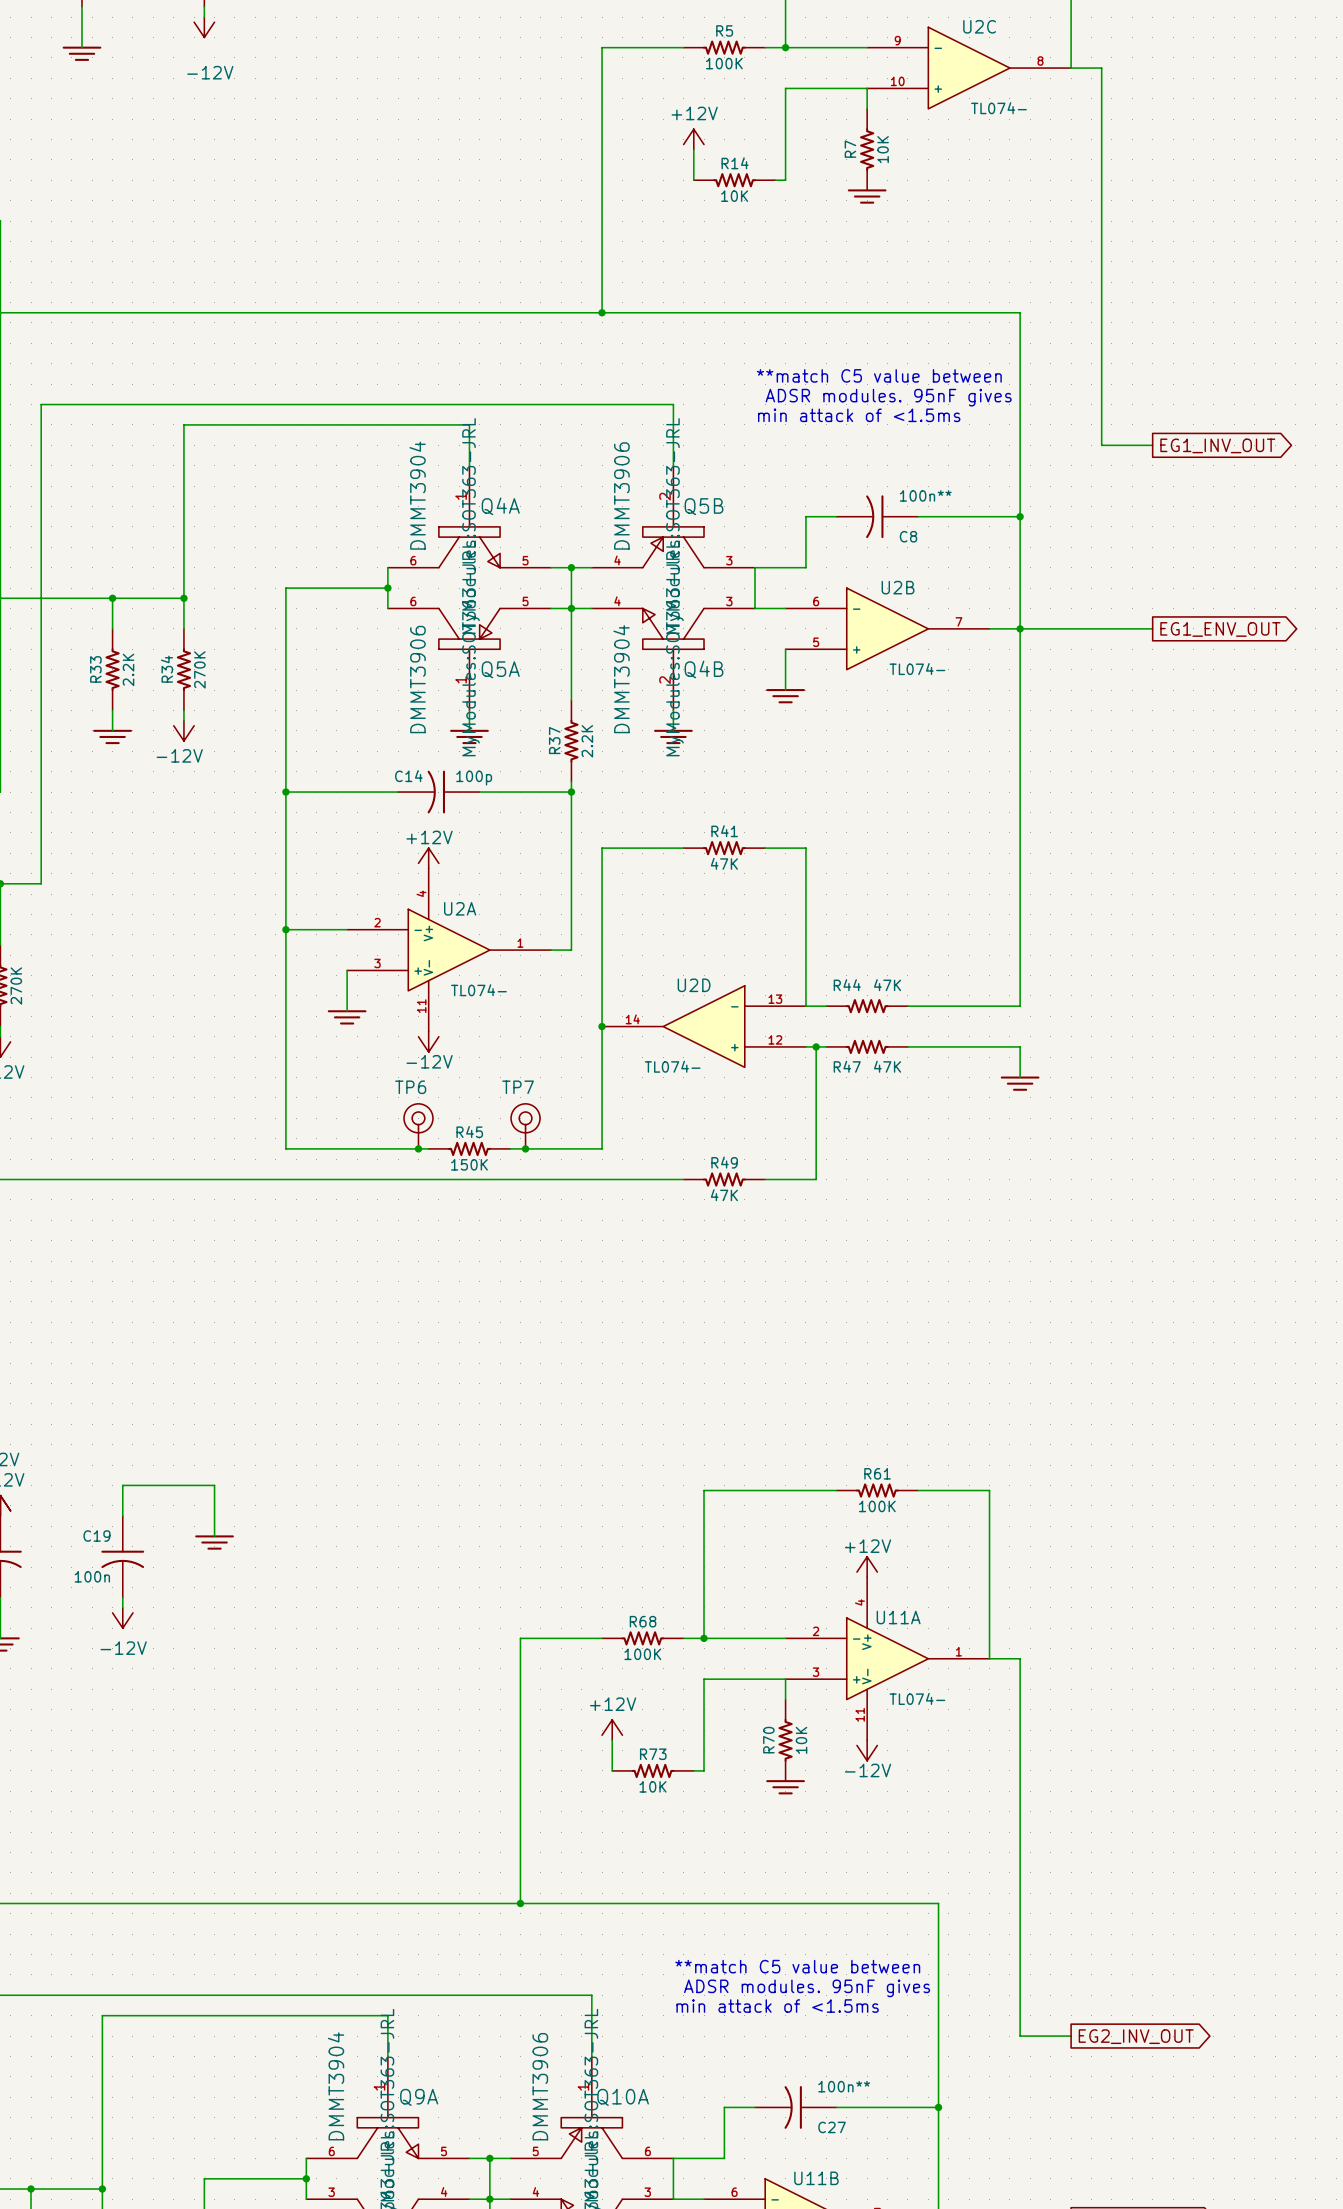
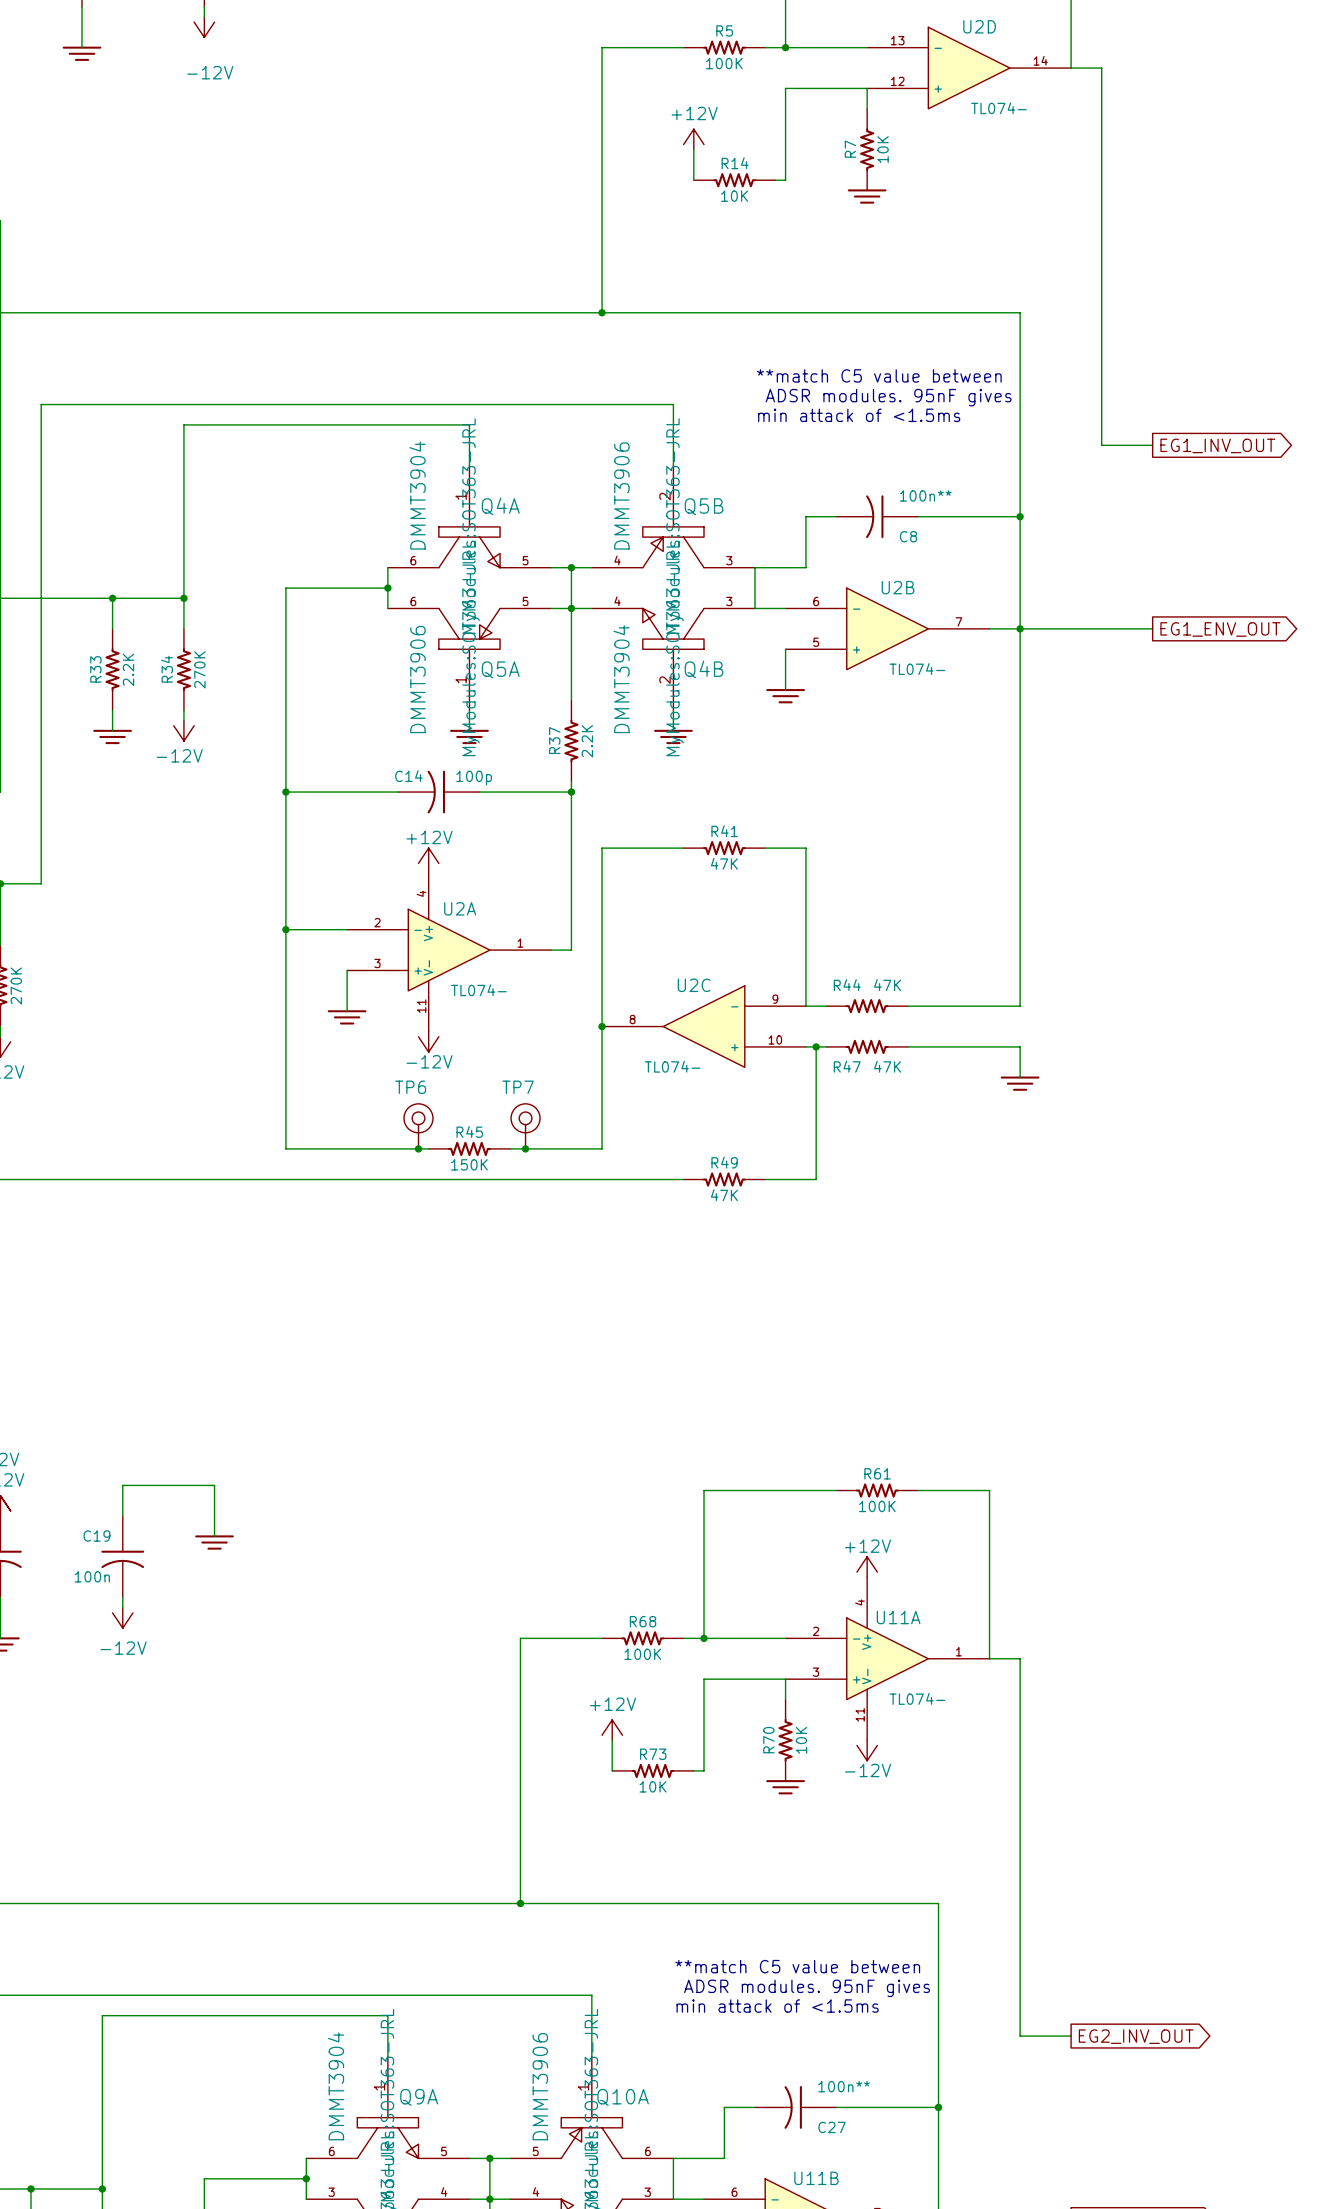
U2C flip: as is (969, 68) -> left-right (704, 1026)
U2C position: (969, 68) -> (704, 1026)
U2D flip: as is (704, 1026) -> left-right (969, 68)
U2D position: (704, 1026) -> (969, 68)

